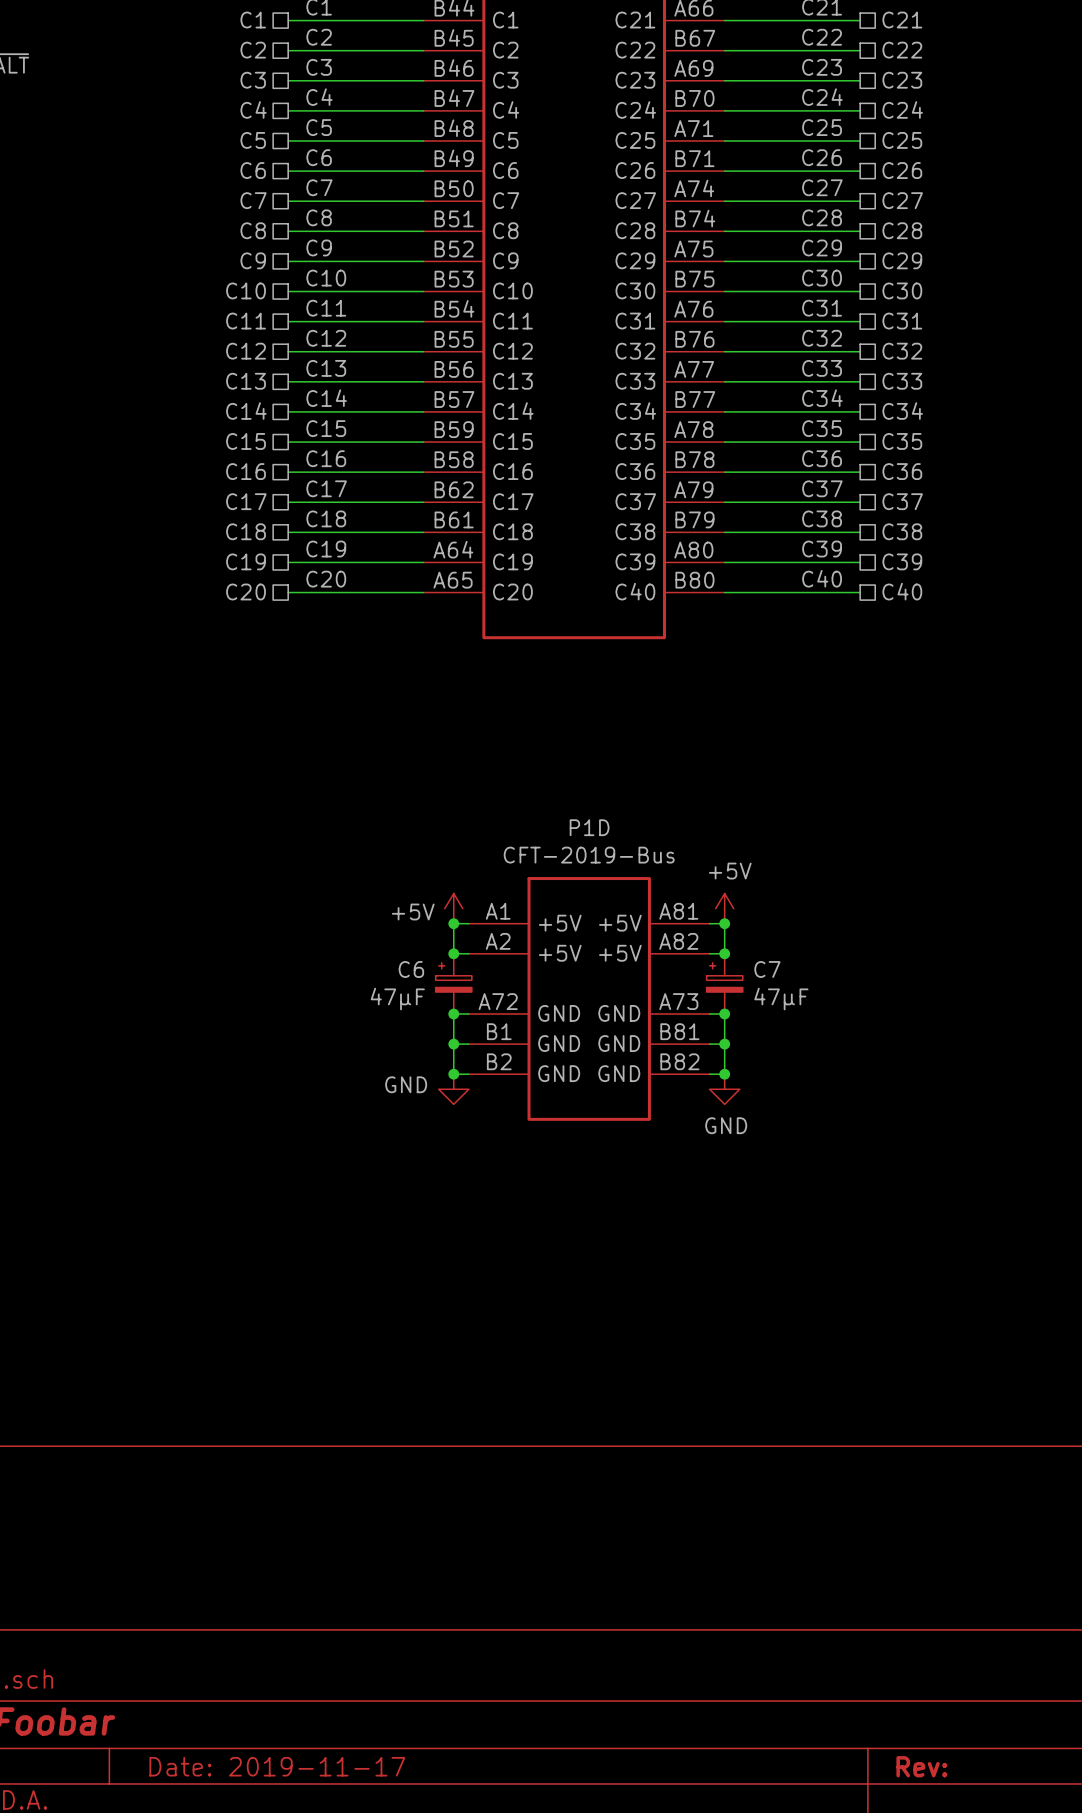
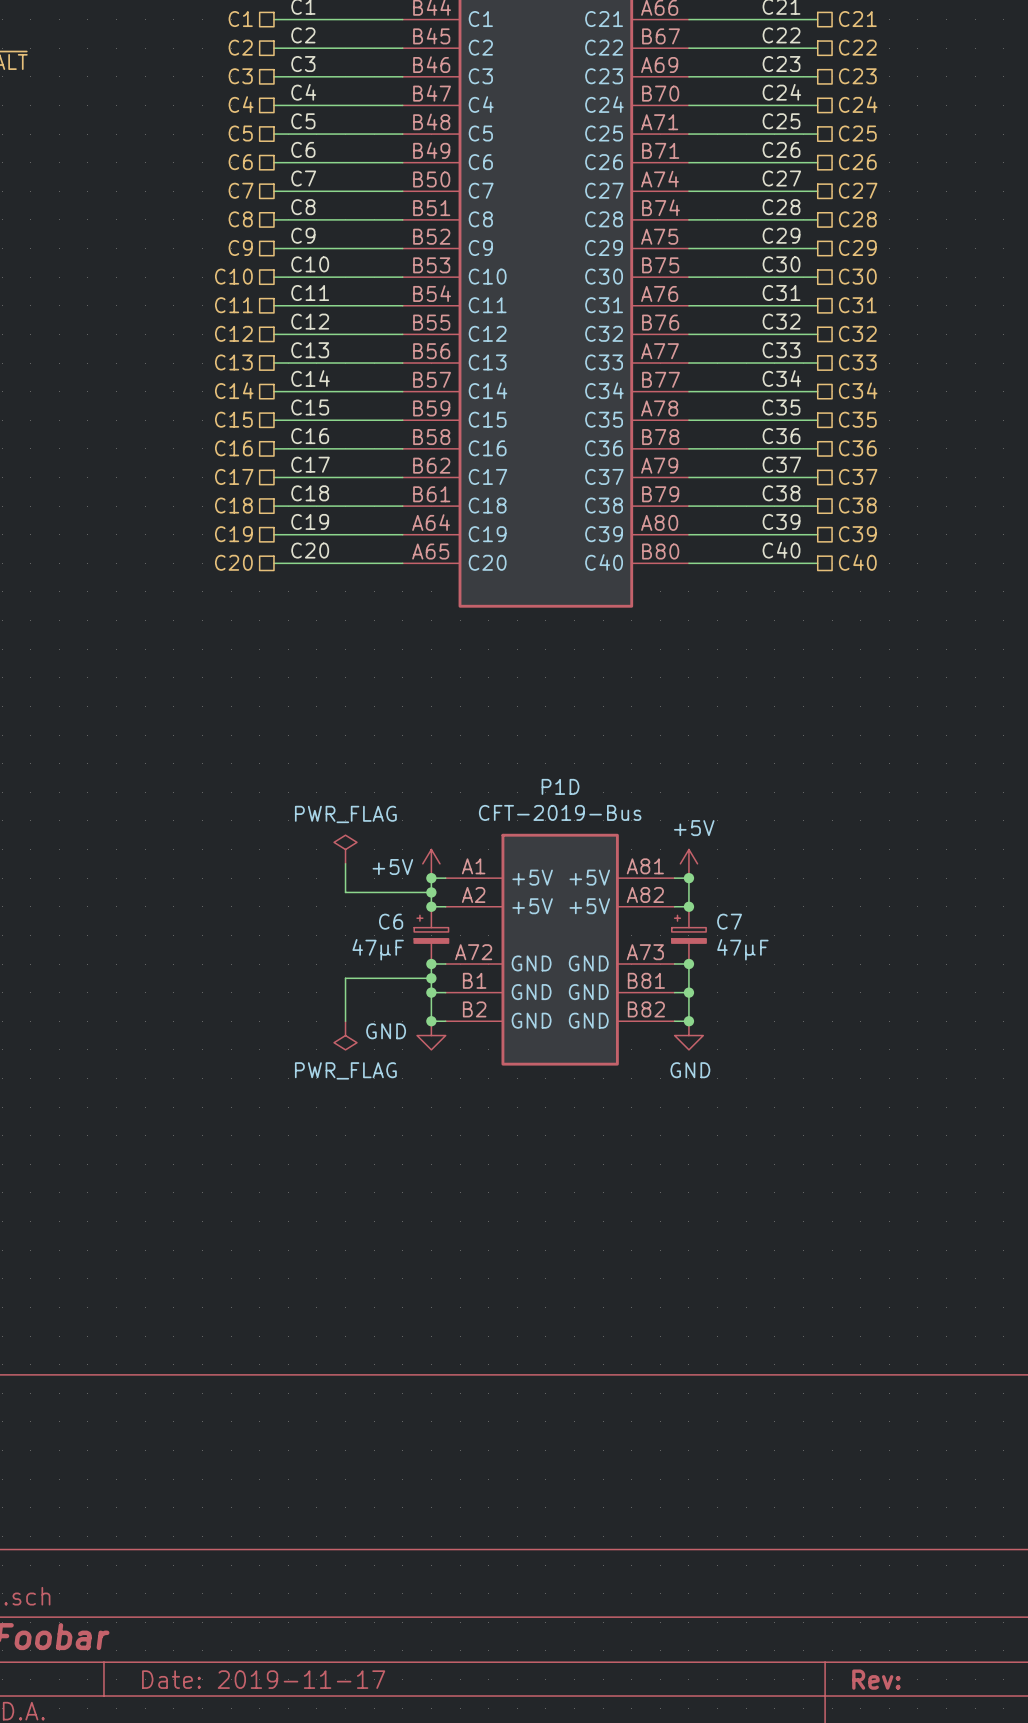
power symbol: none -> PWR_FLAG (345, 849)
wire: none -> (345, 863) (345, 892) (431, 892)
junction: none -> (431, 892)
wire: none -> (431, 978) (345, 978) (345, 1021)
junction: none -> (431, 978)
power symbol: none -> PWR_FLAG (345, 1035)

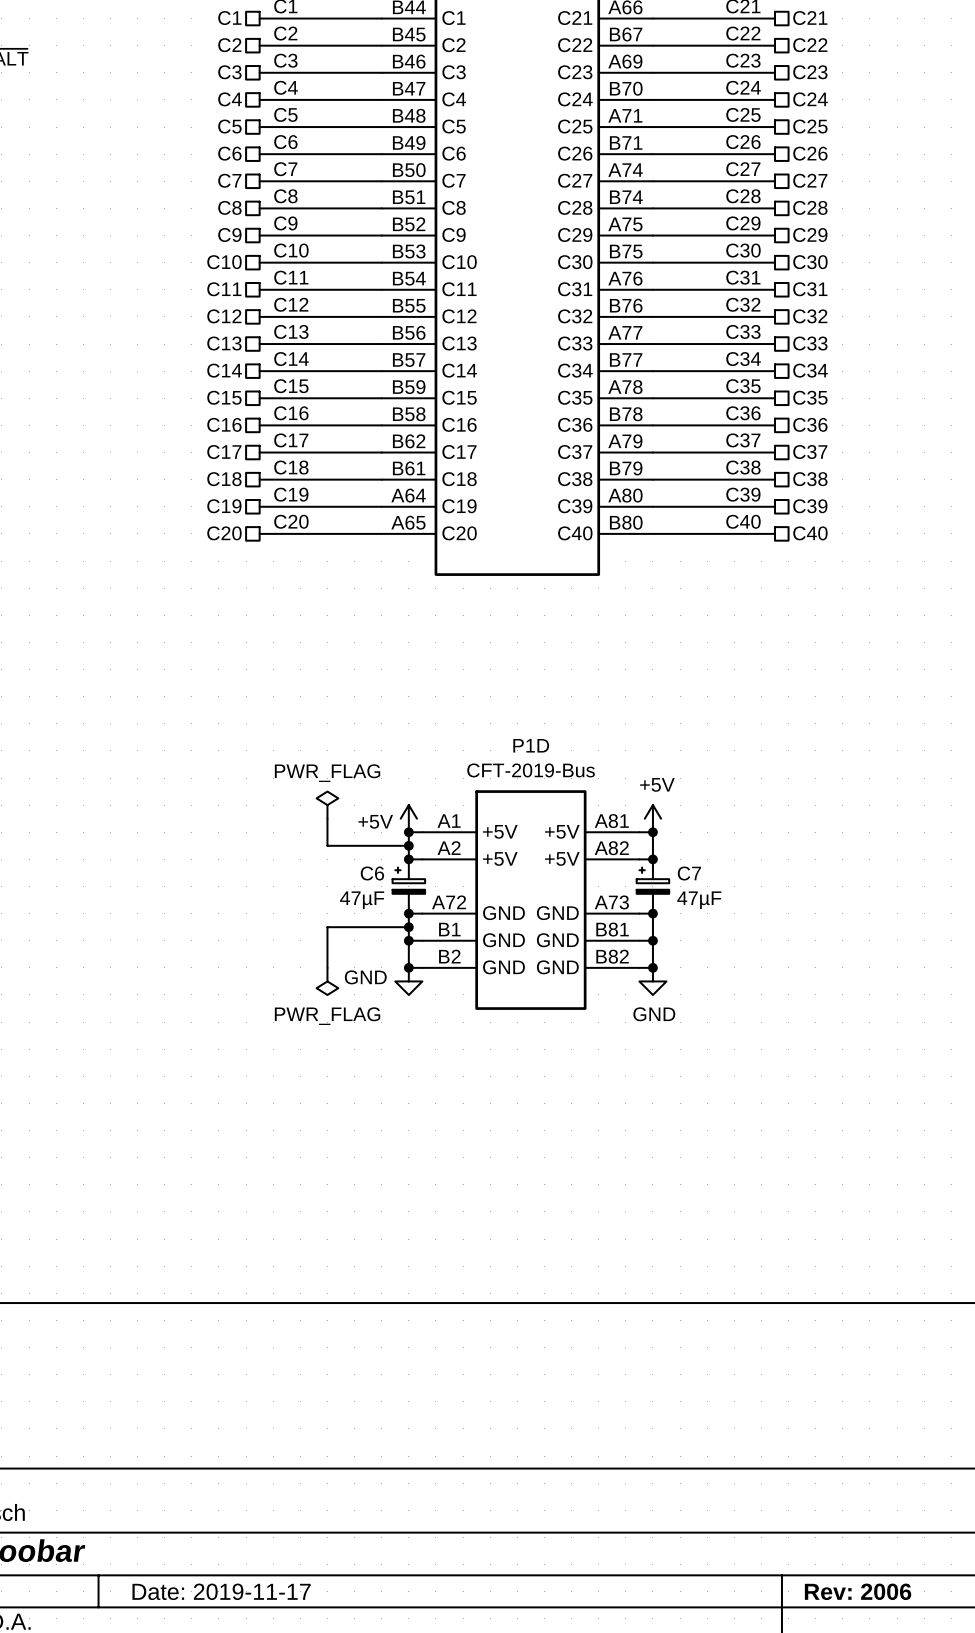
title block: Rev: (876, 1679) -> Rev: 2006 (858, 1591)

